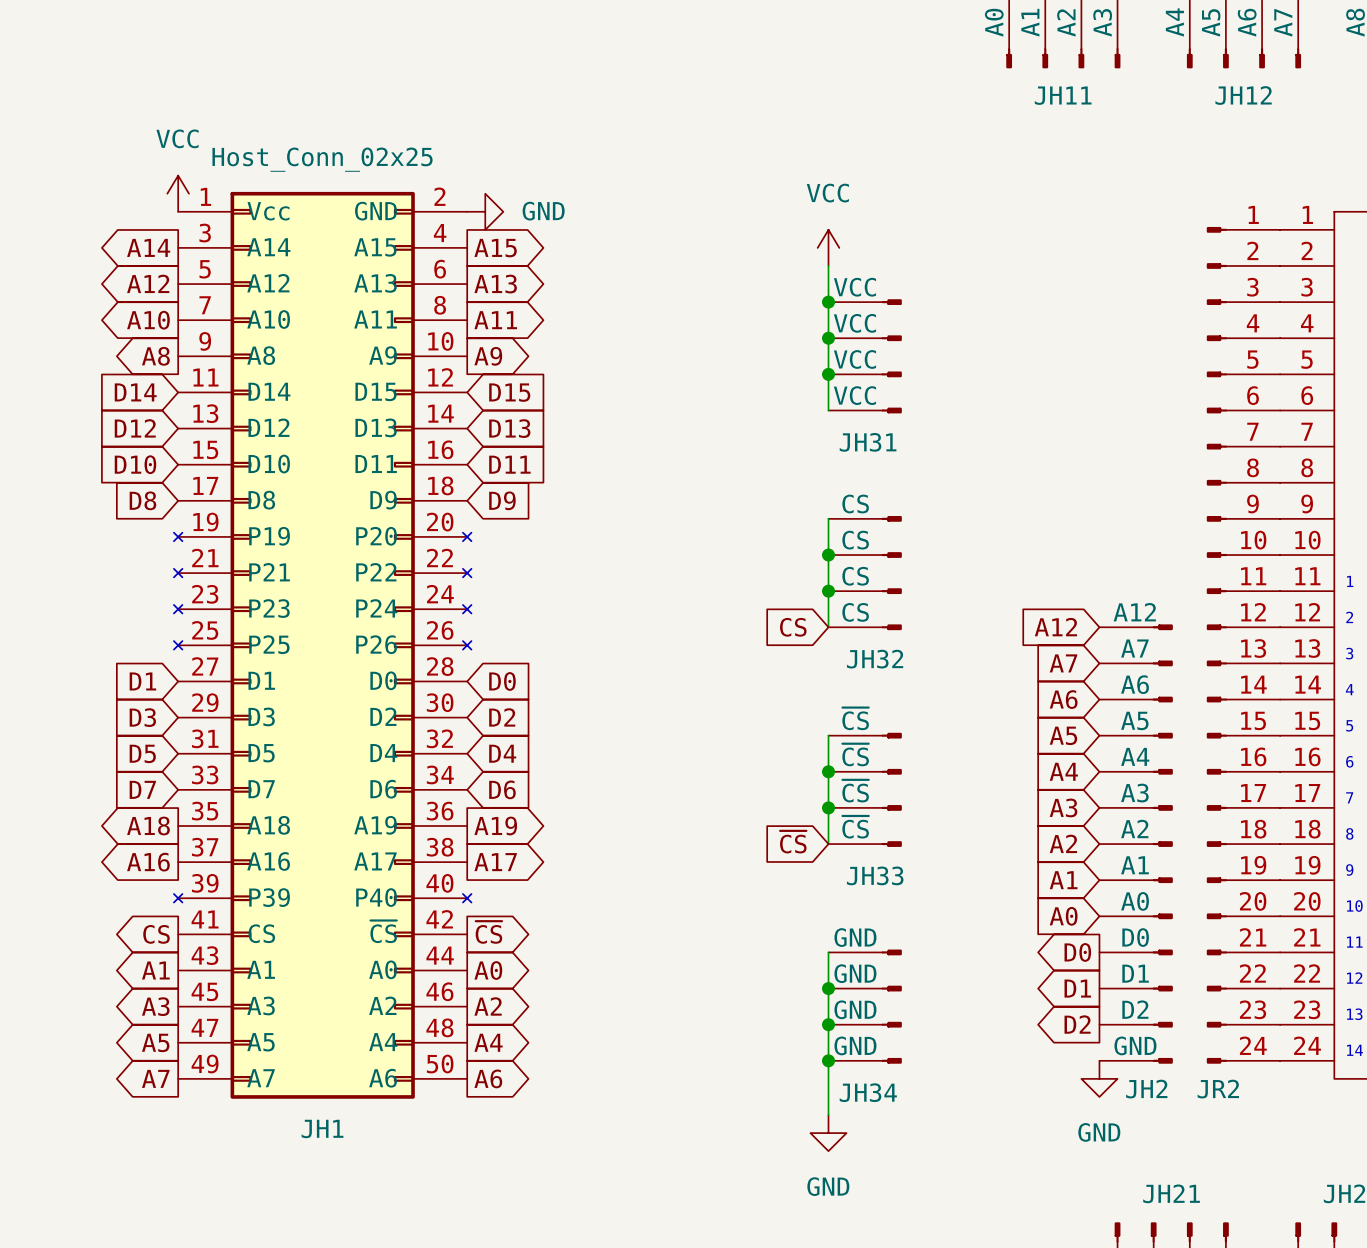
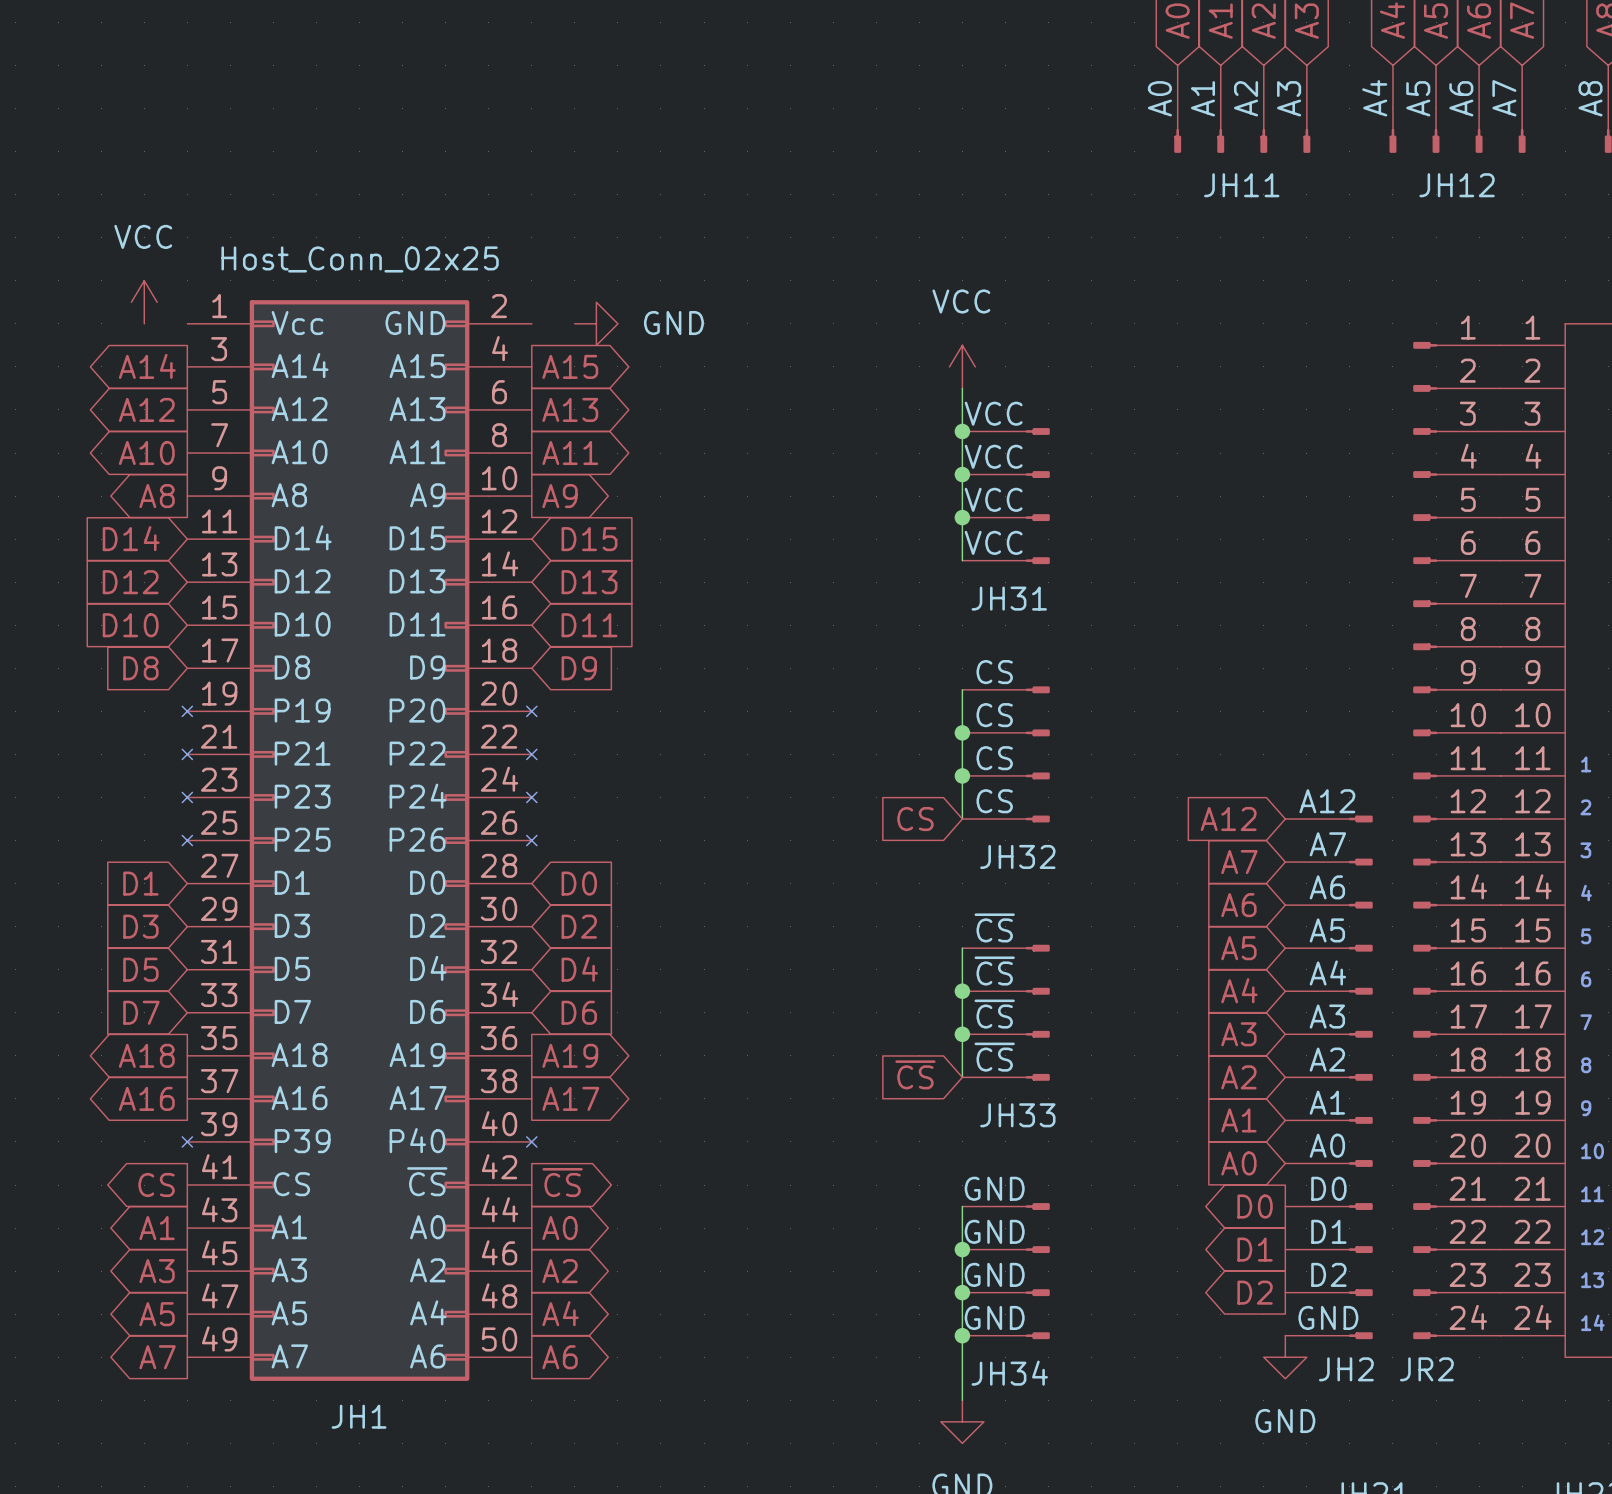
power symbol position: VCC (178, 193) -> VCC (144, 302)
power symbol position: GND (485, 211) -> GND (596, 323)

